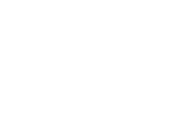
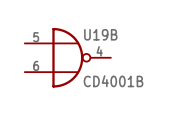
U19B: none -> CD4001B (67, 57)

